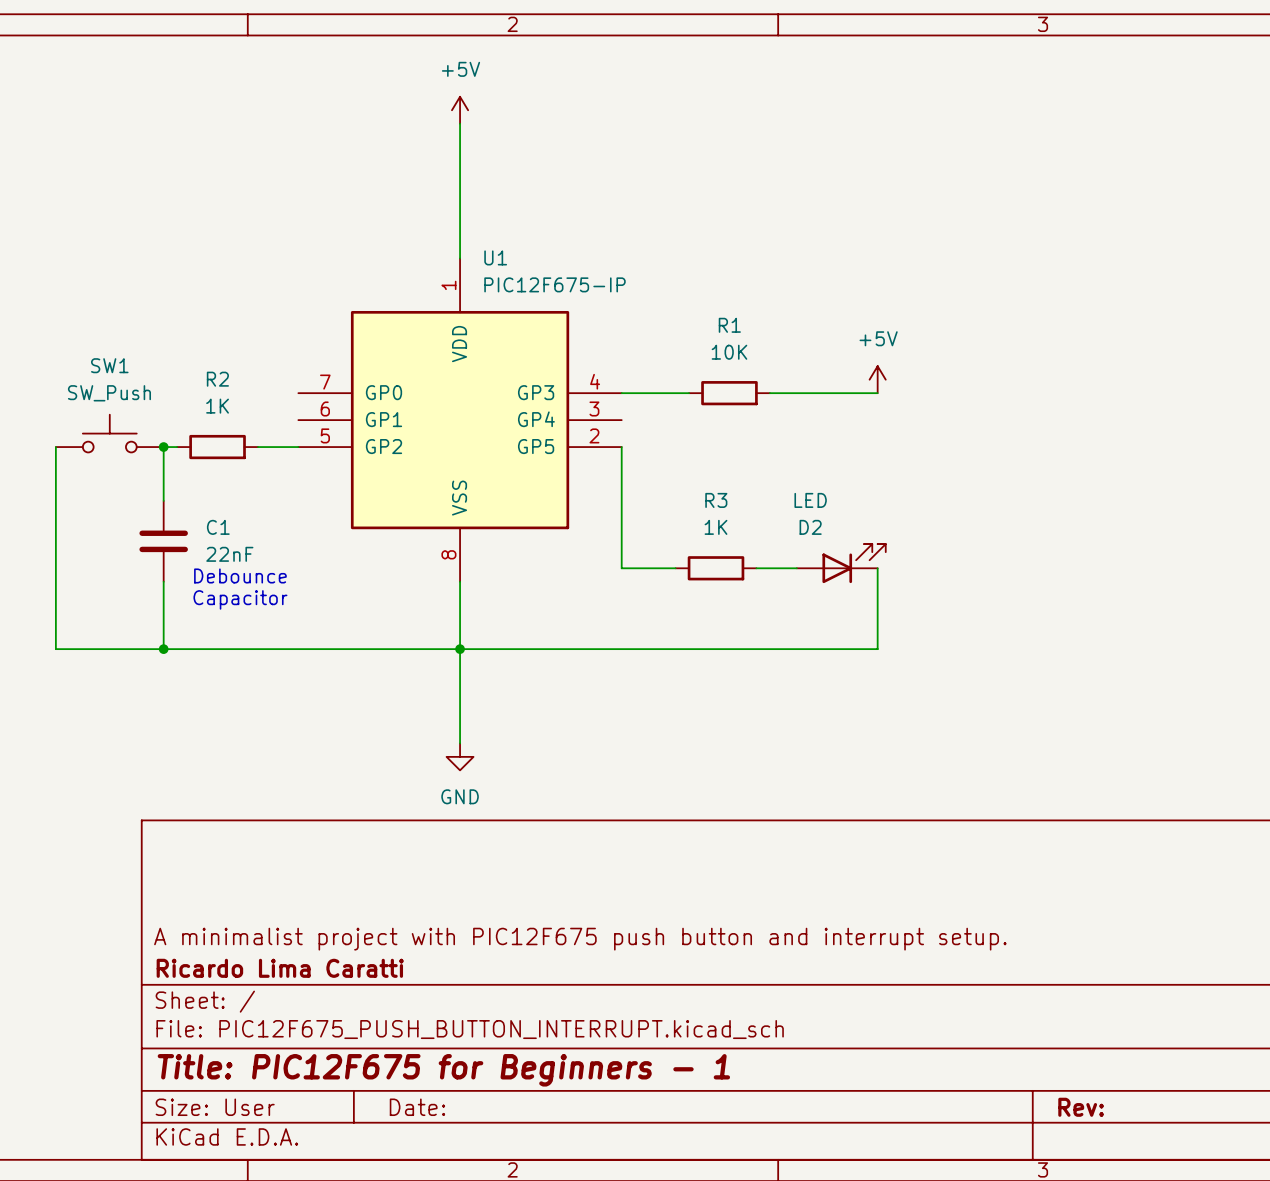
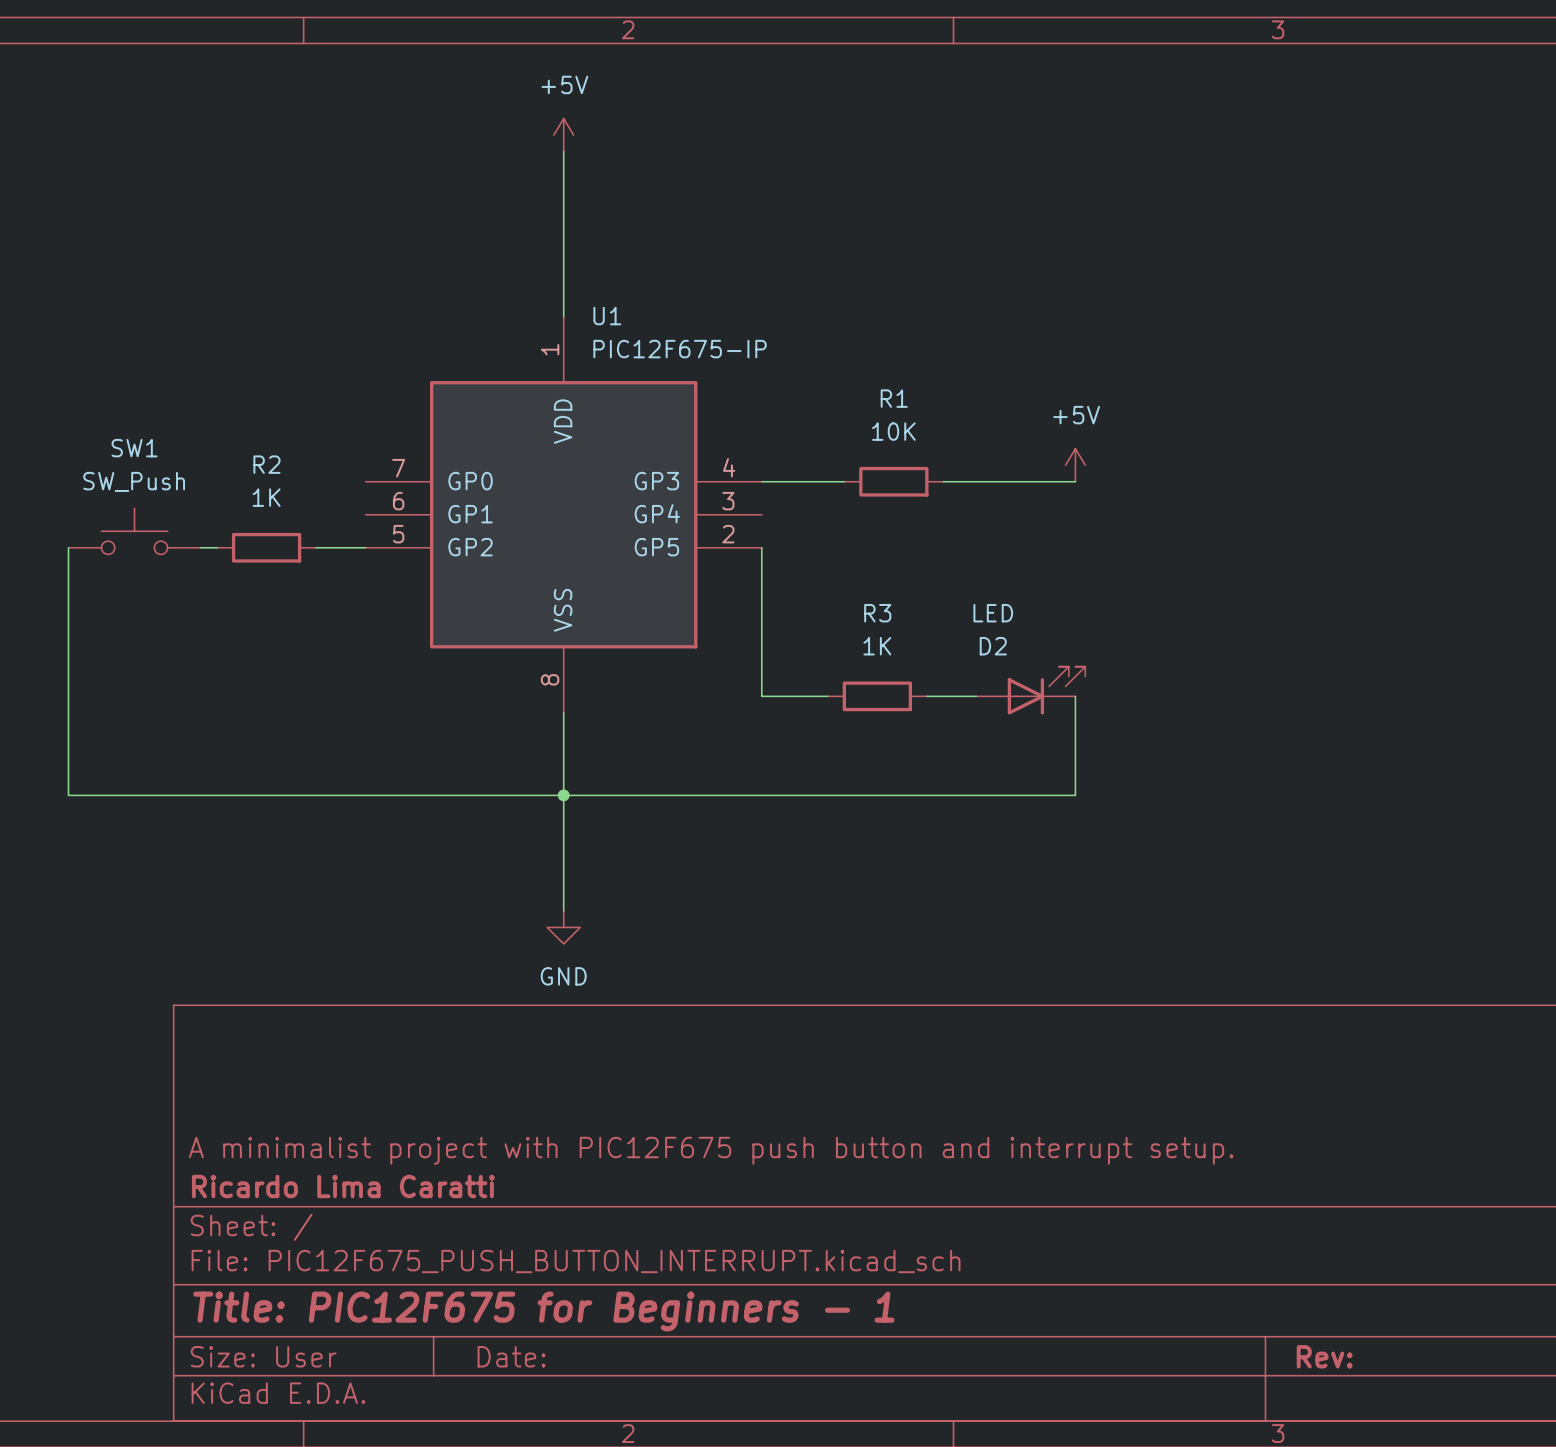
wire: (163, 447) (163, 500) -> none
junction: (163, 447) -> none
C1: 22nF (163, 541) -> none
text: Debounce (240, 575) -> none
wire: (163, 581) (163, 649) -> none
text: Capacitor (240, 599) -> none
junction: (163, 649) -> none

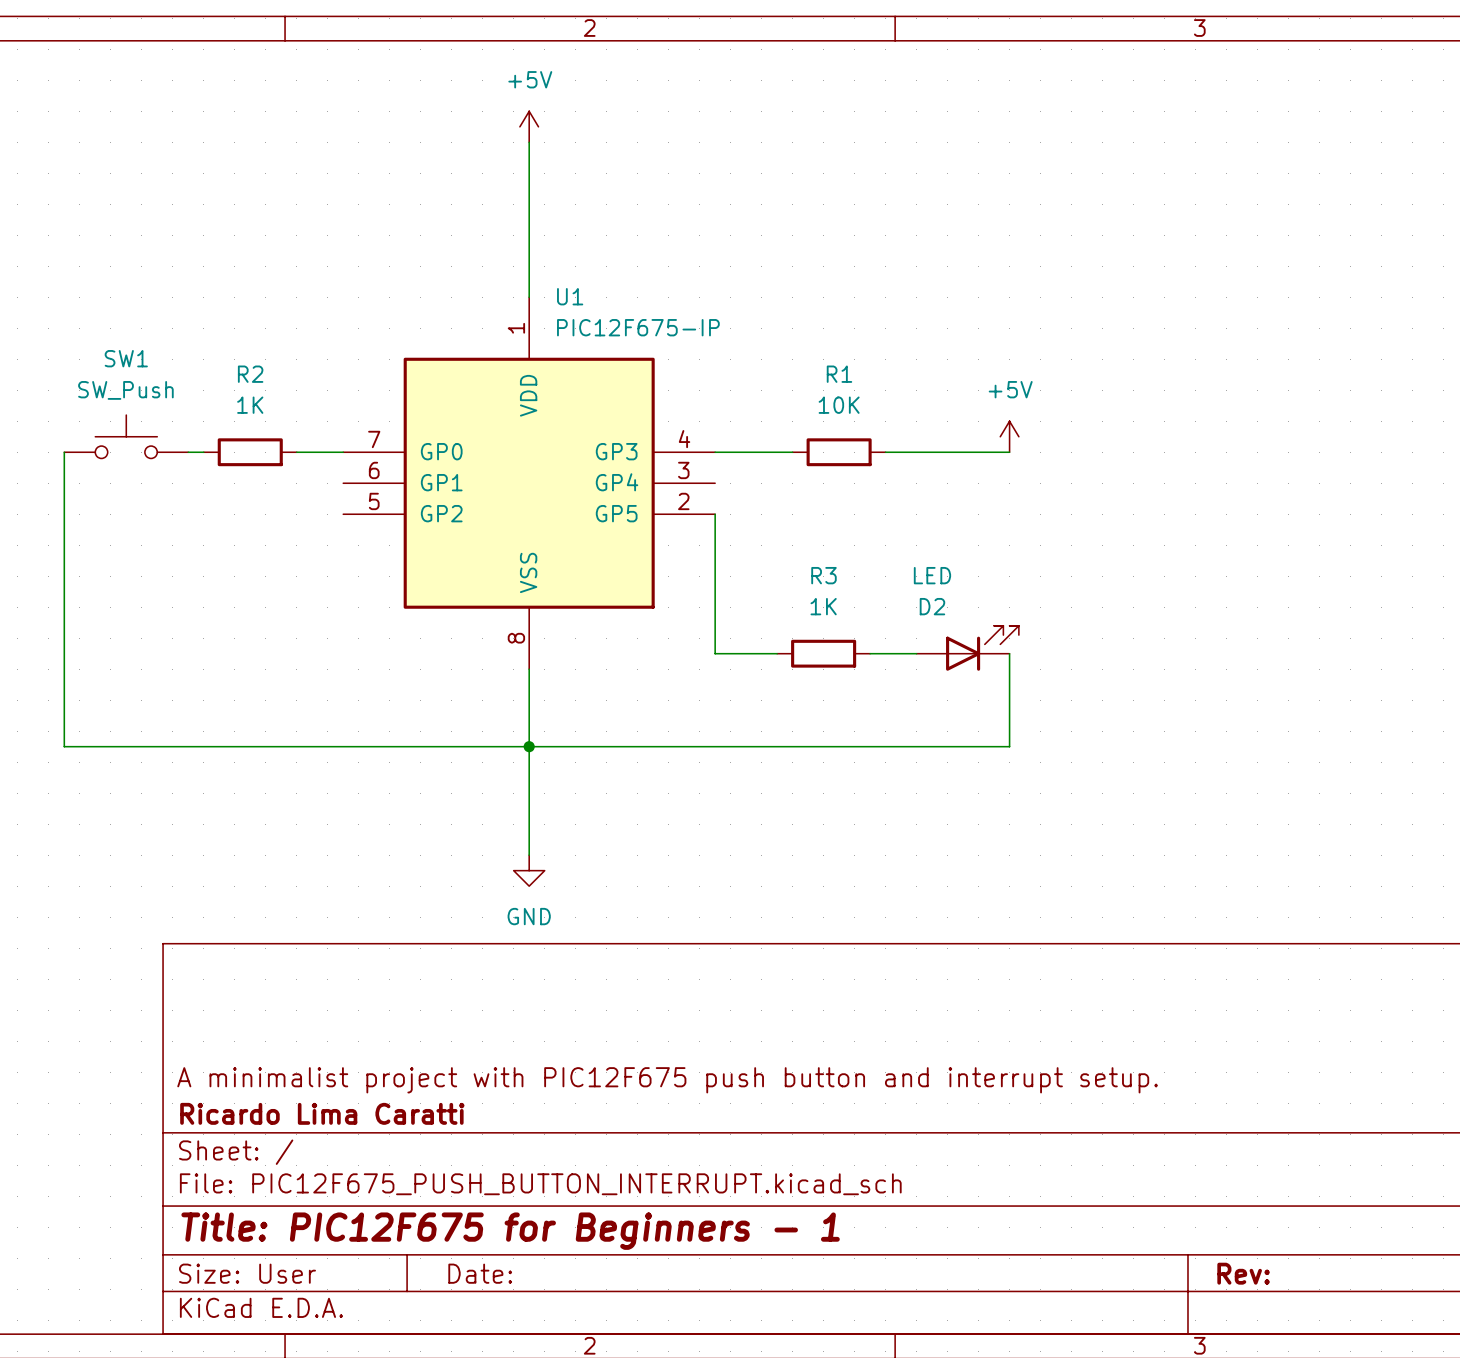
wire: none -> (64, 452) (64, 514)
SW1 position: (134, 531) -> (126, 436)
wire: (200, 547) (217, 547) -> (188, 452) (203, 452)
R2 position: (266, 547) -> (250, 452)
wire: (316, 547) (365, 547) -> (296, 452) (343, 452)

